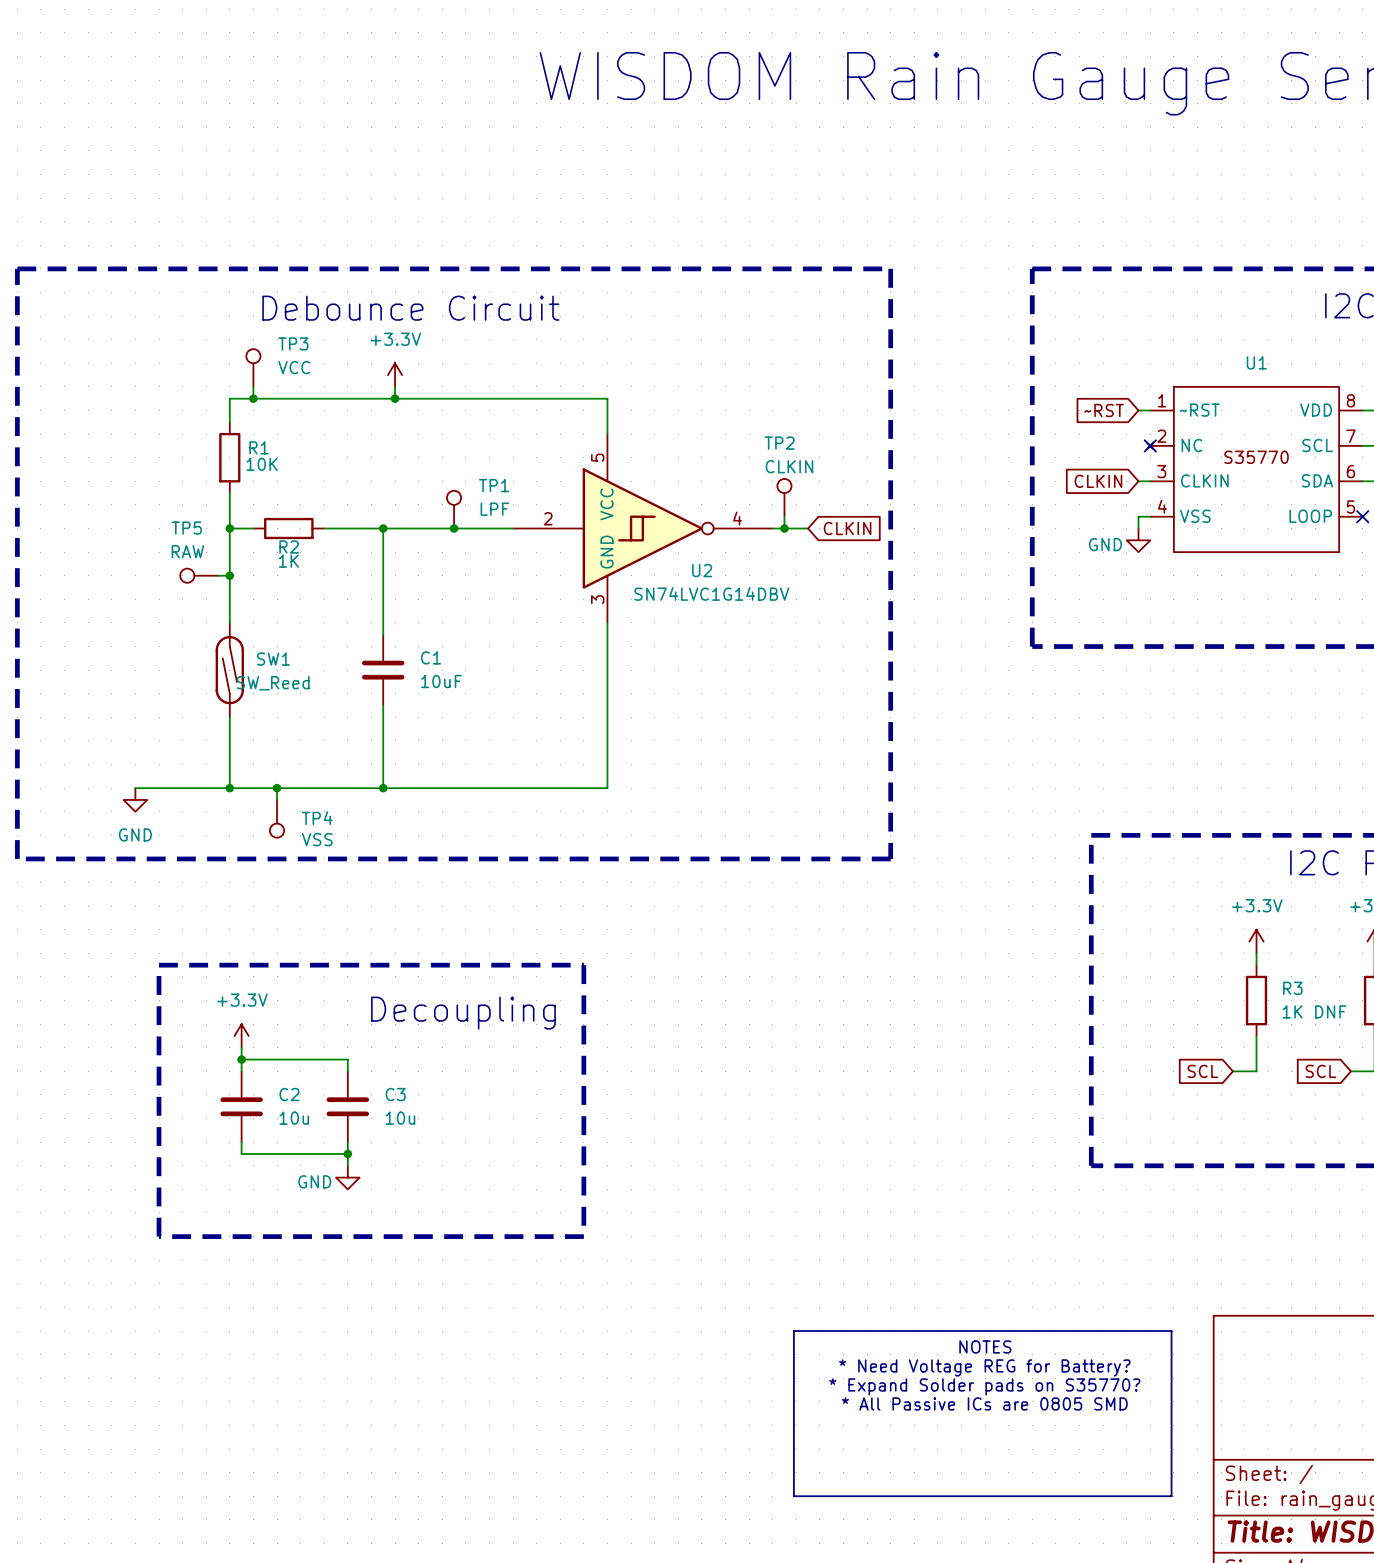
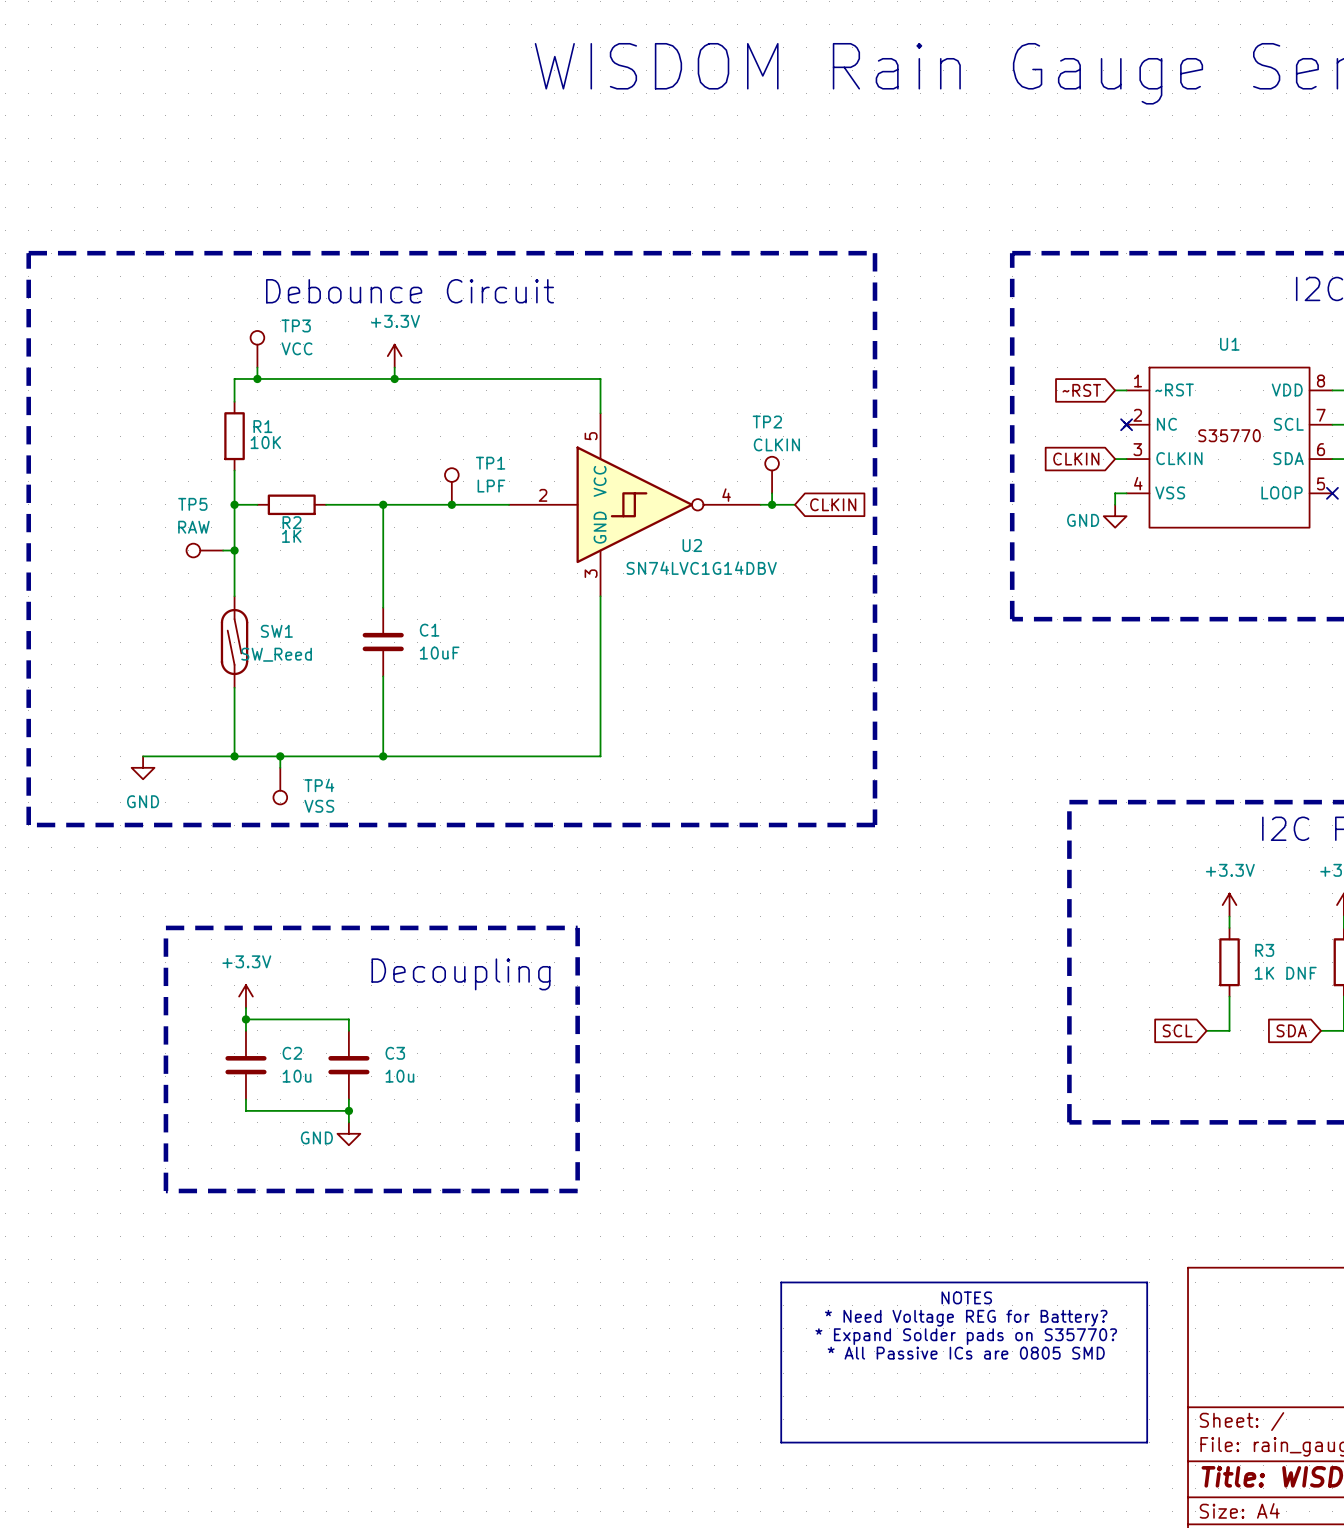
global label: SCL (1320, 1071) -> SDA (1291, 1030)

